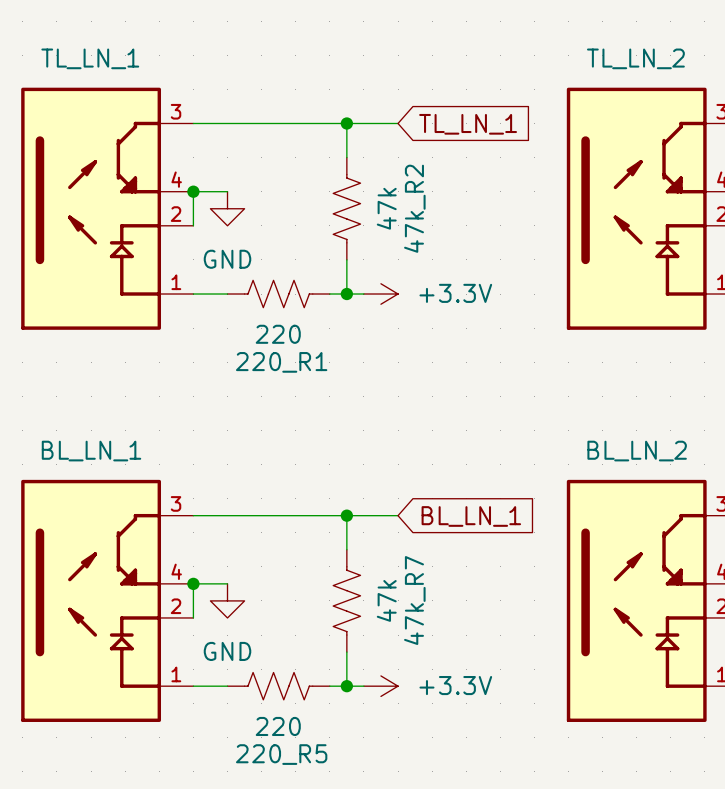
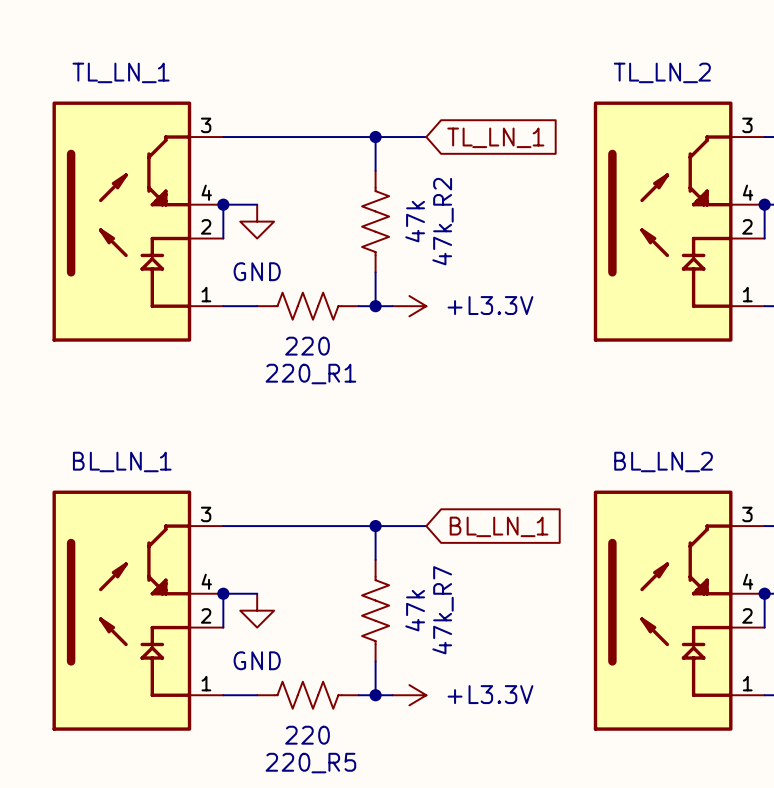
power symbol: +3.3V (380, 294) -> +L3.3V (409, 306)
power symbol: +3.3V (380, 686) -> +L3.3V (409, 695)

